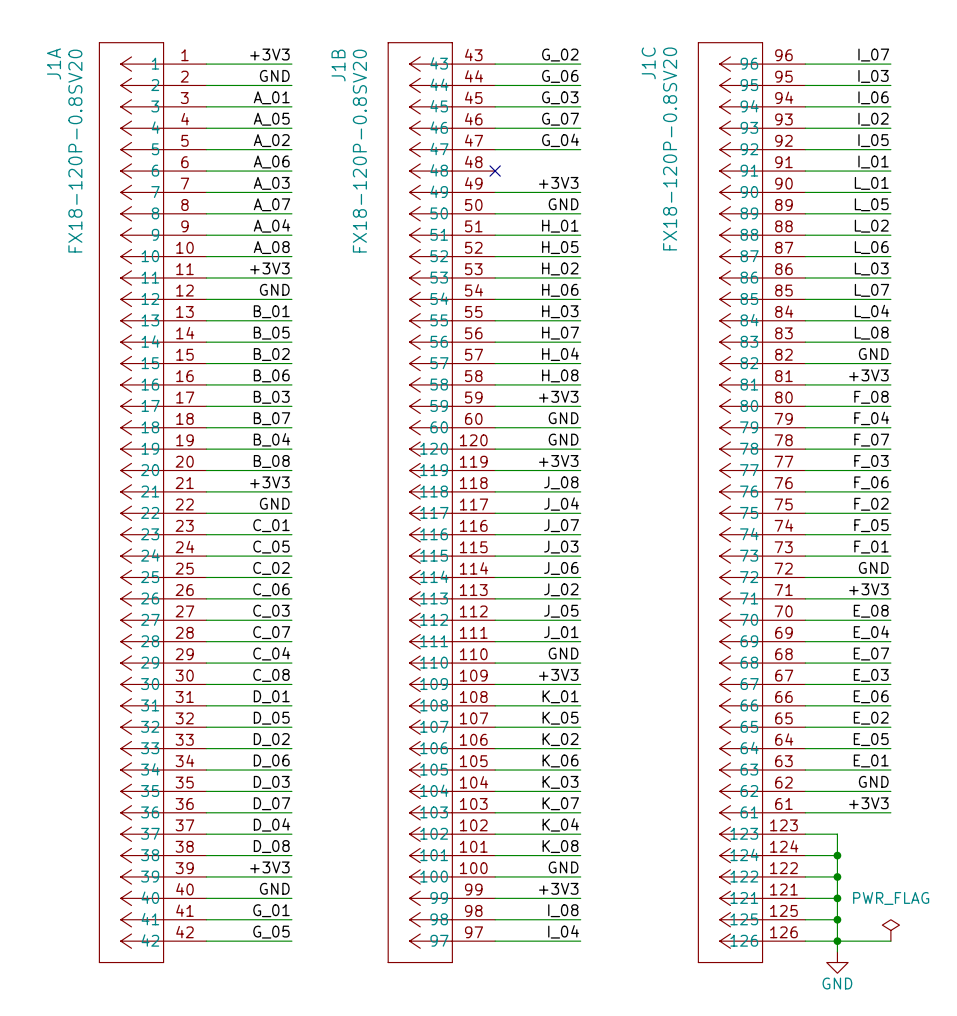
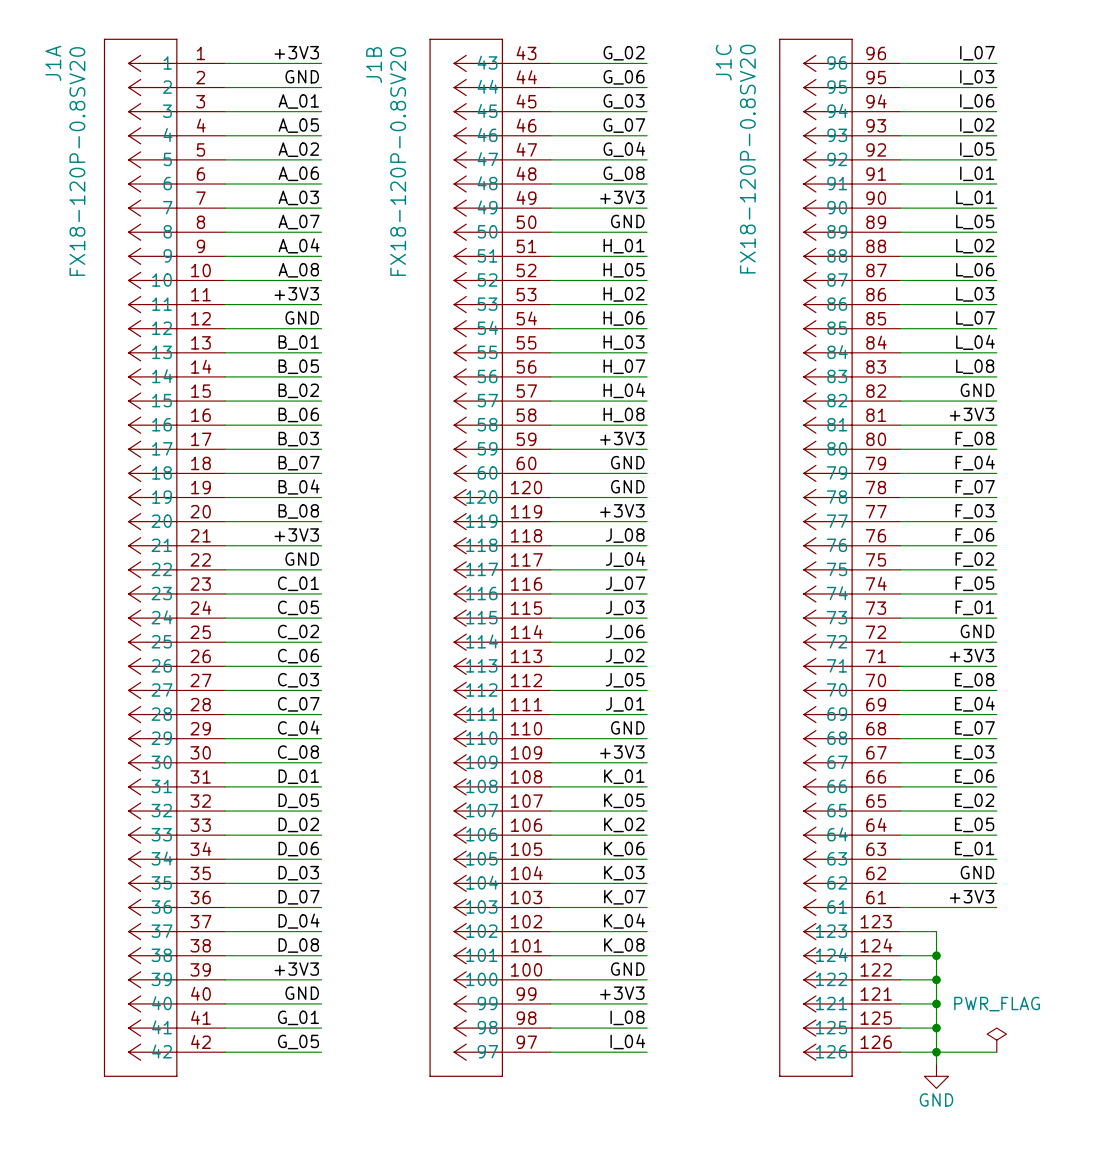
label: none -> G_08 (624, 173)
wire: none -> (550, 184) (647, 184)
no-connect mark: (495, 171) -> none

